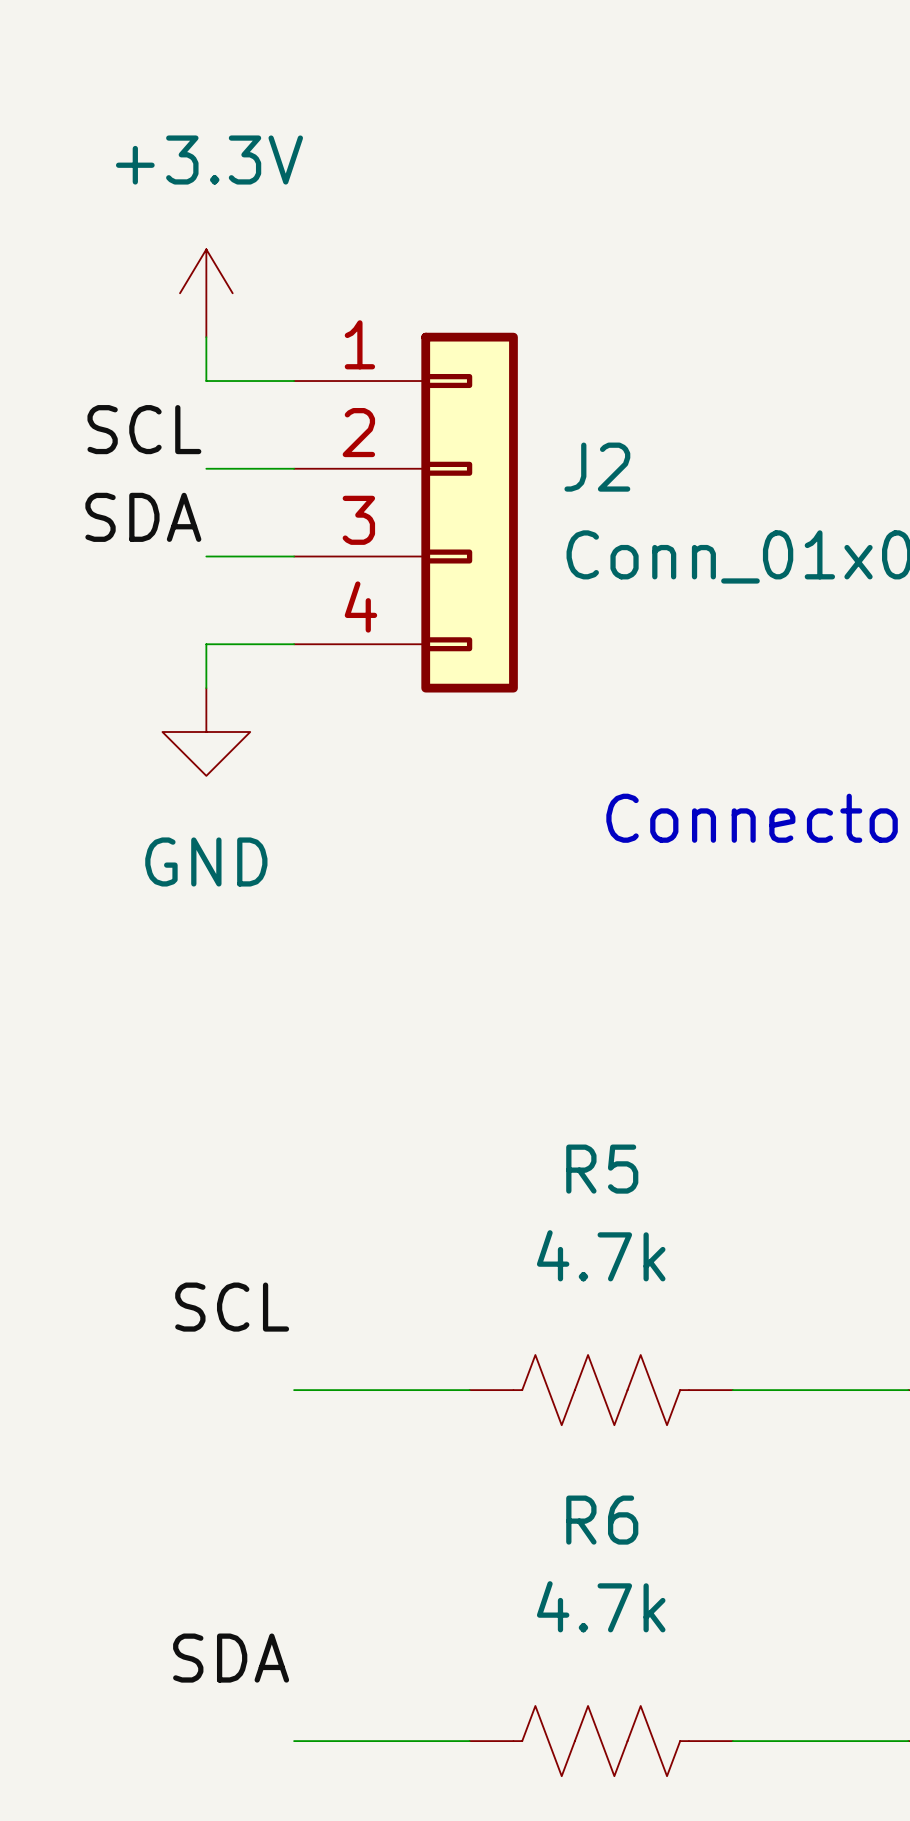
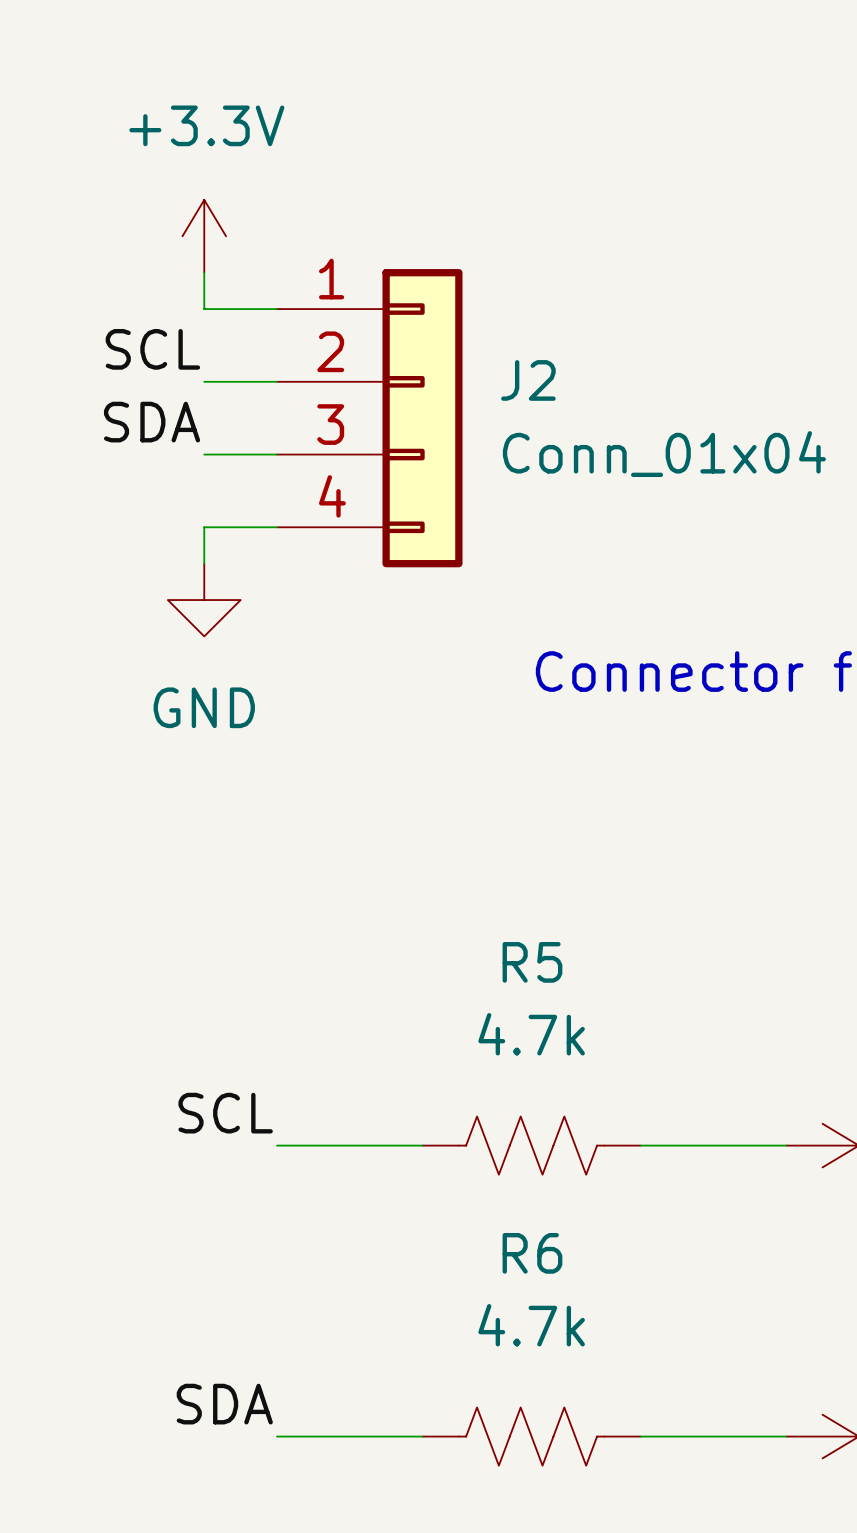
label position: SCL (232, 1307) -> SCL (225, 1113)
label position: SDA (231, 1658) -> SDA (224, 1404)

